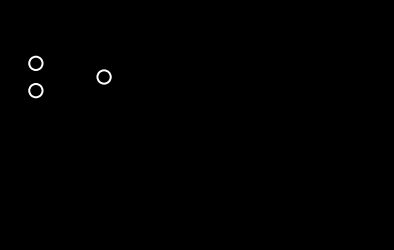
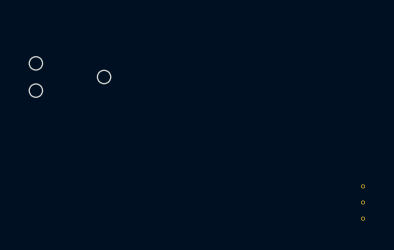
part: none -> (363, 202)

